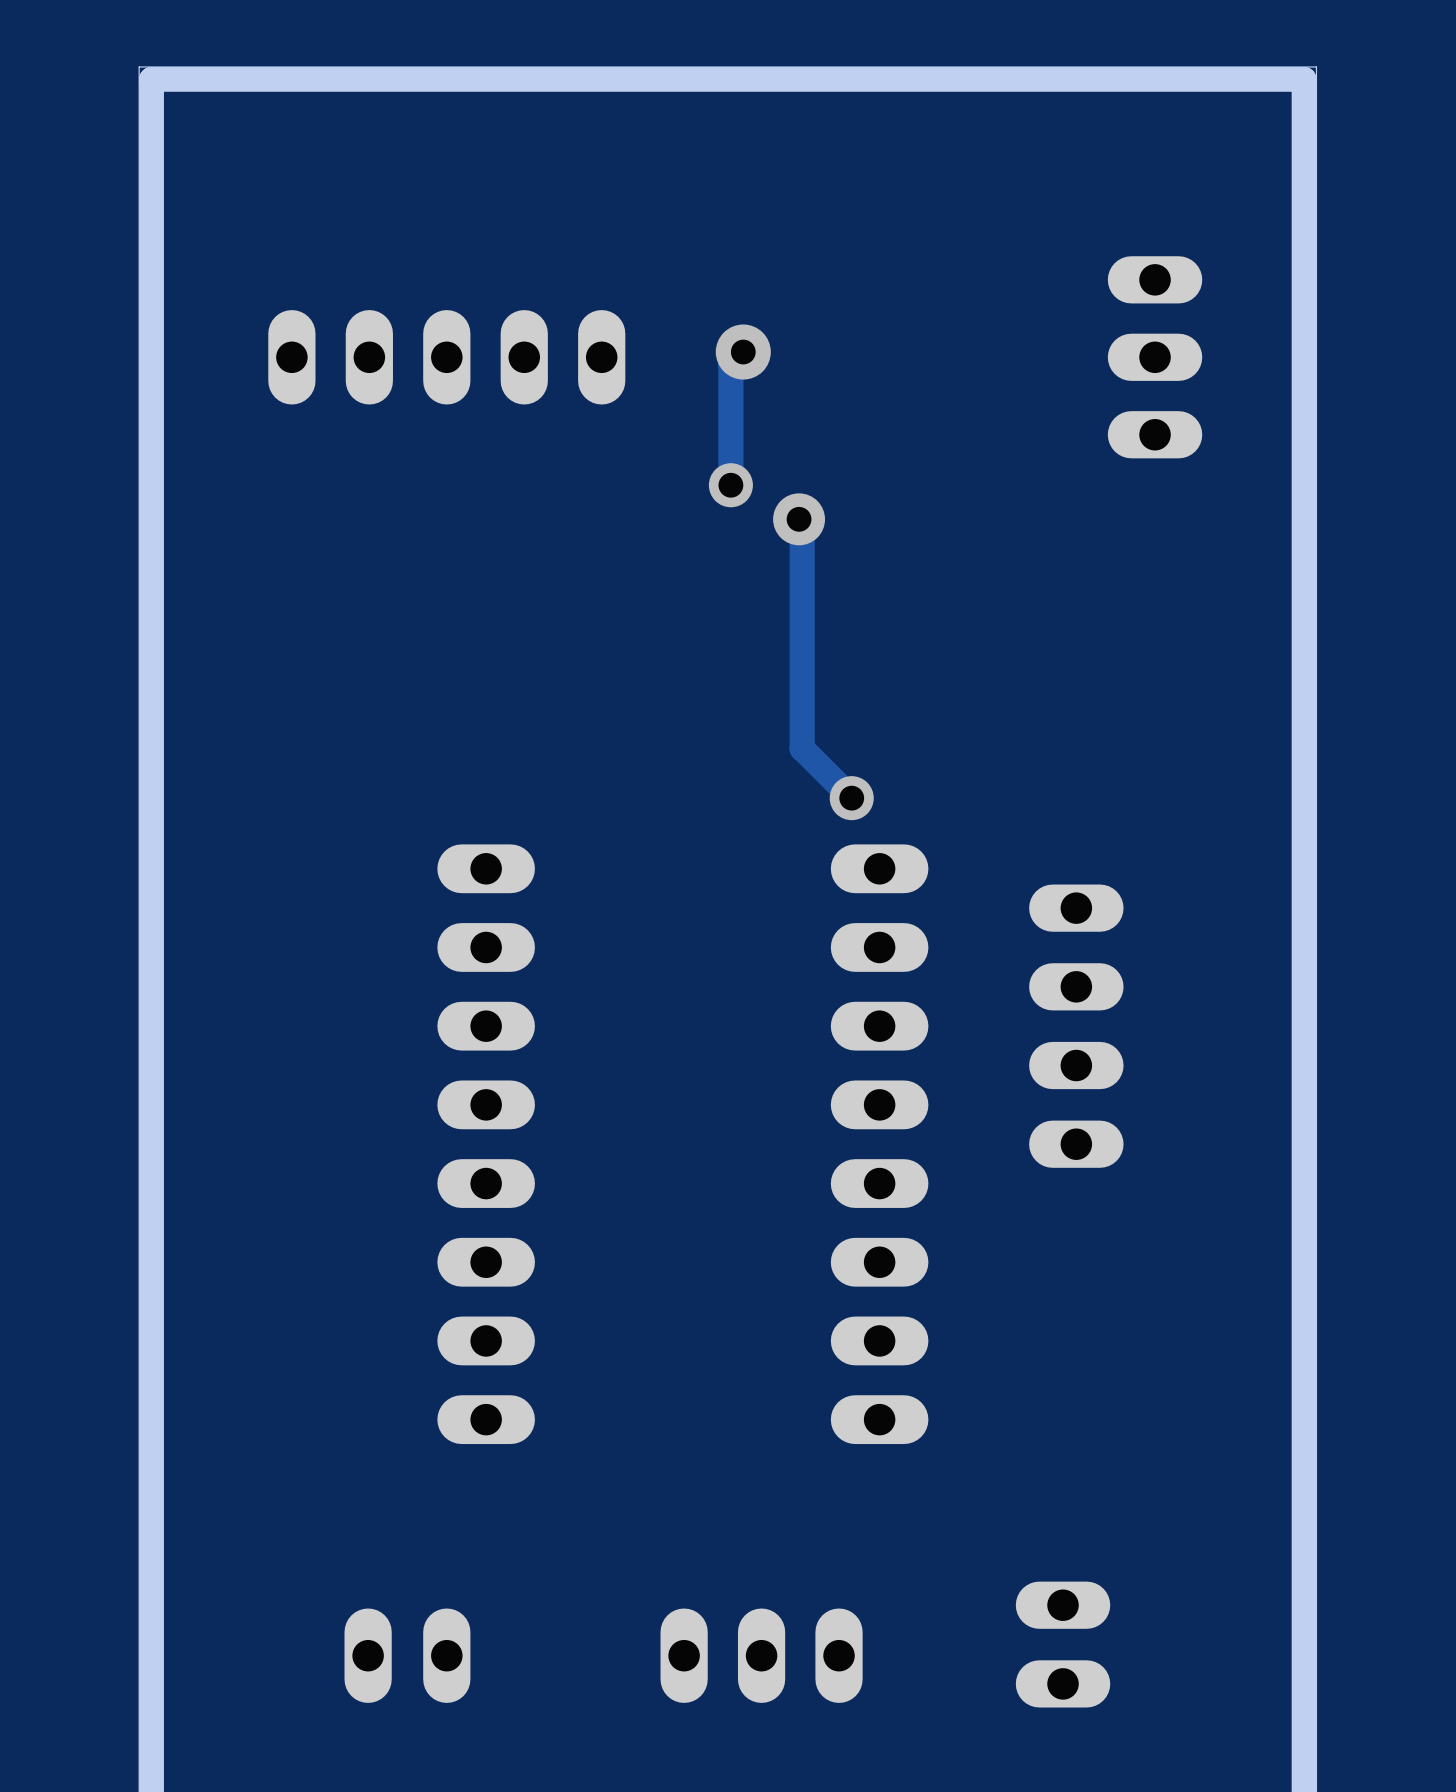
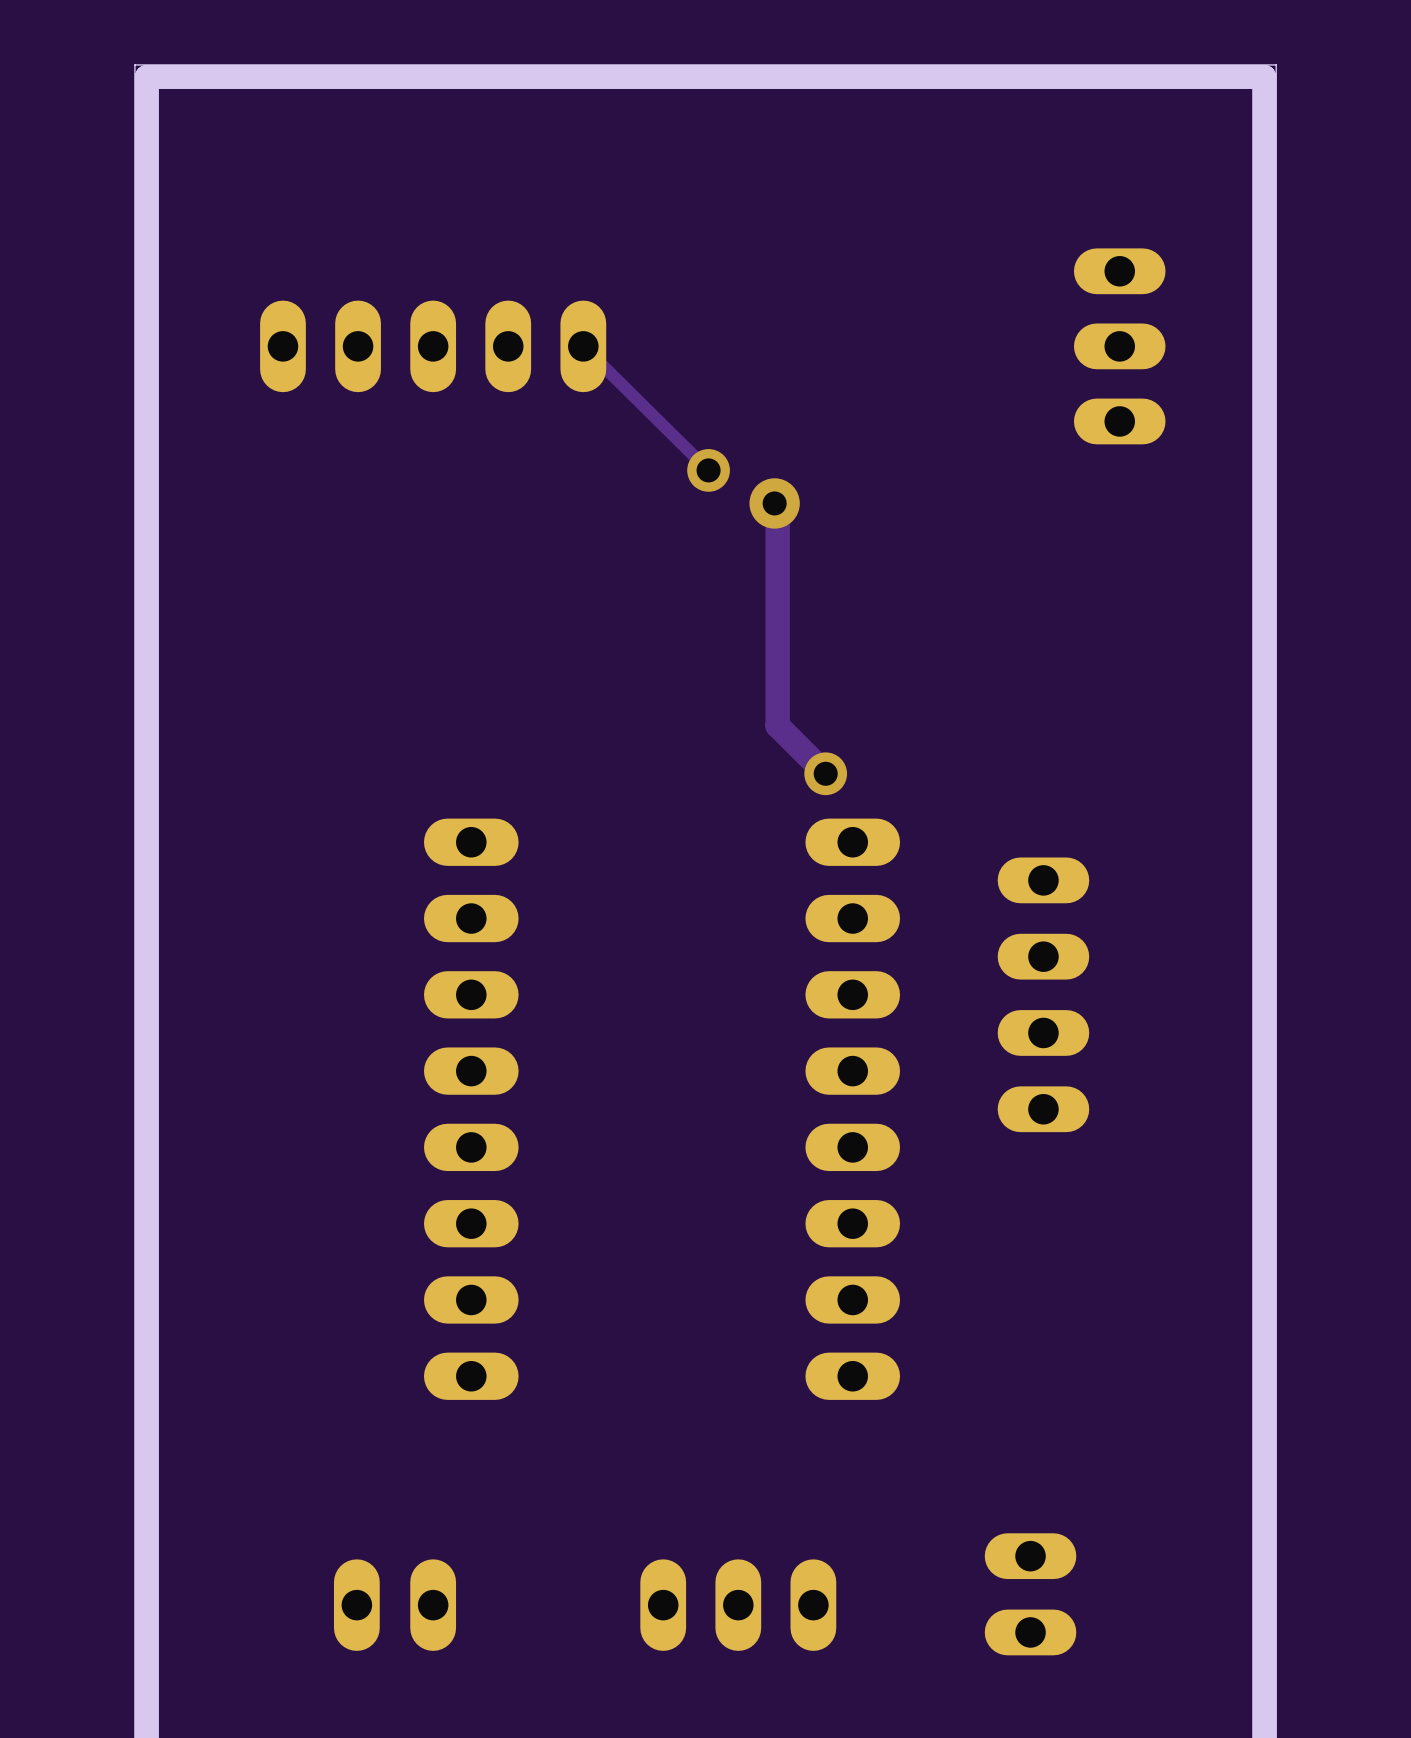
track: (743, 352) (730, 364) (730, 485) -> (583, 346) (708, 470)
via: (743, 352) -> none

